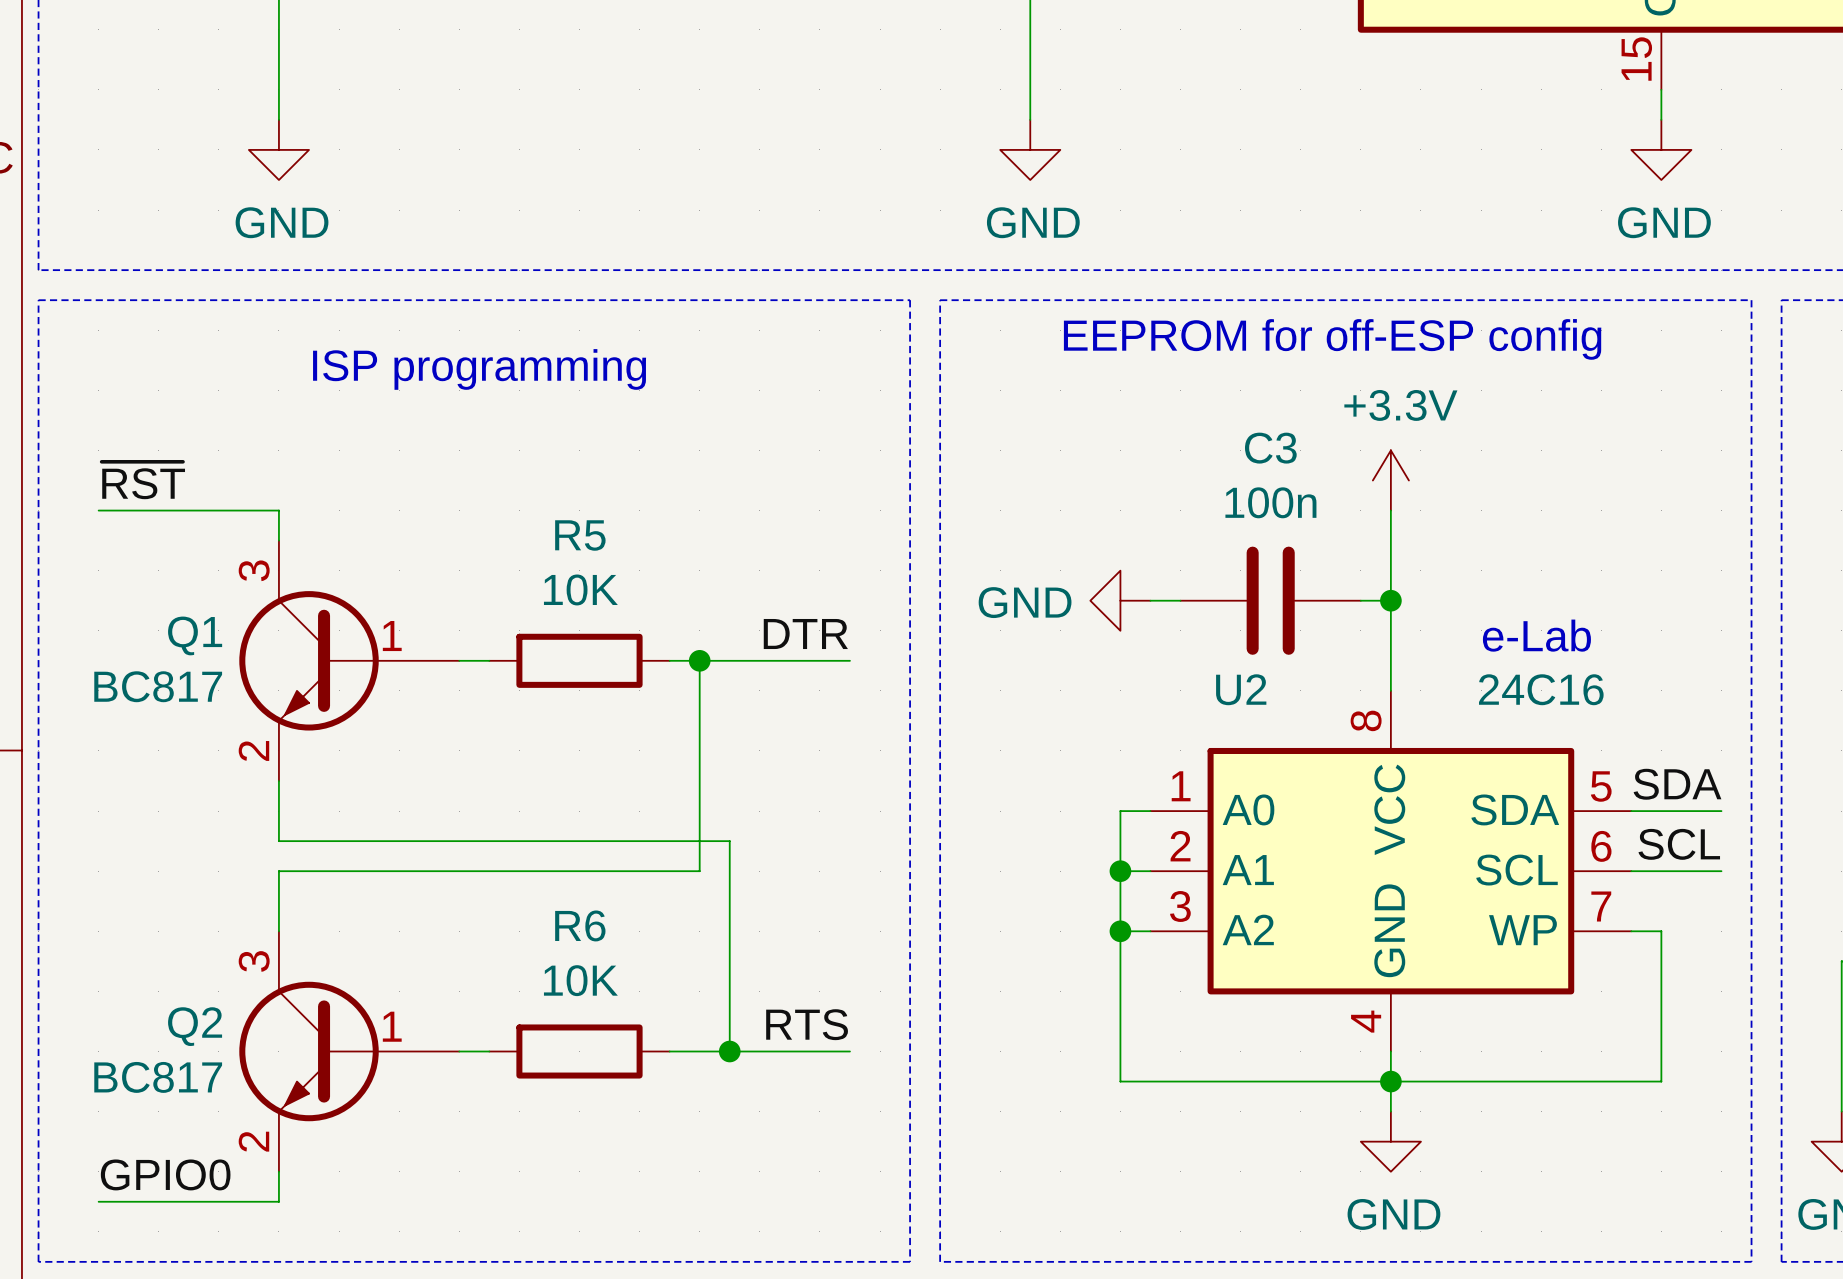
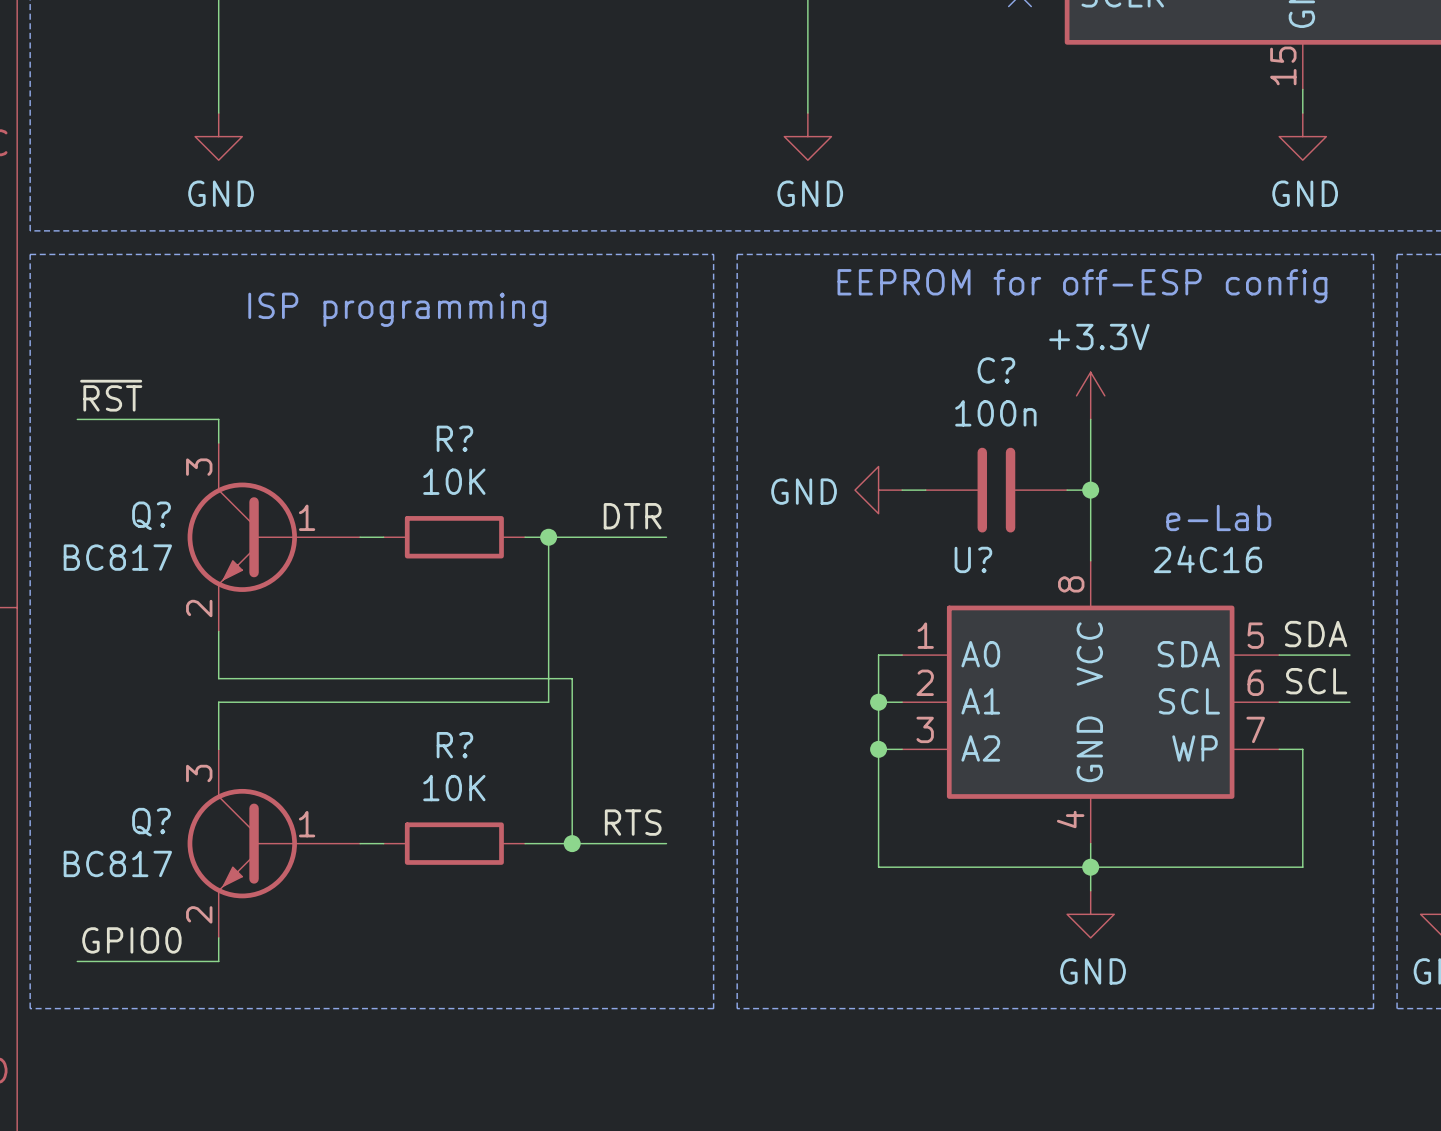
C3 name: C3 (1270, 448) -> C? (996, 370)
R5 name: R5 (580, 535) -> R? (454, 438)
Q1 name: Q1 (195, 635) -> Q? (151, 515)
U2 name: U2 (1241, 689) -> U? (973, 559)
R6 name: R6 (580, 925) -> R? (454, 745)
Q2 name: Q2 (195, 1026) -> Q? (151, 822)

